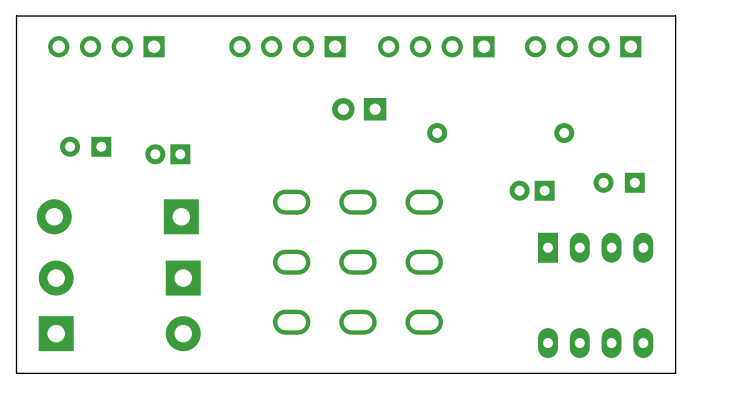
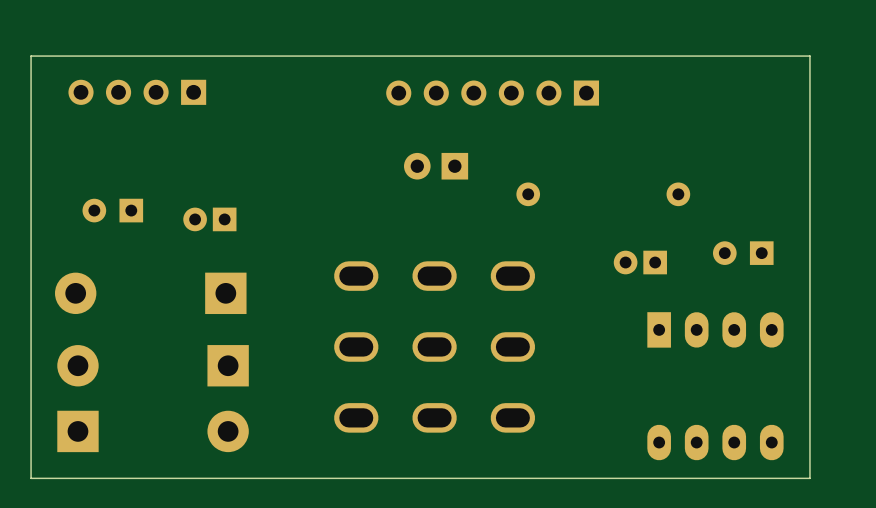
part: (287, 46) -> none
part: (436, 46) -> none
part: (583, 46) -> none
part: none -> (492, 93)

